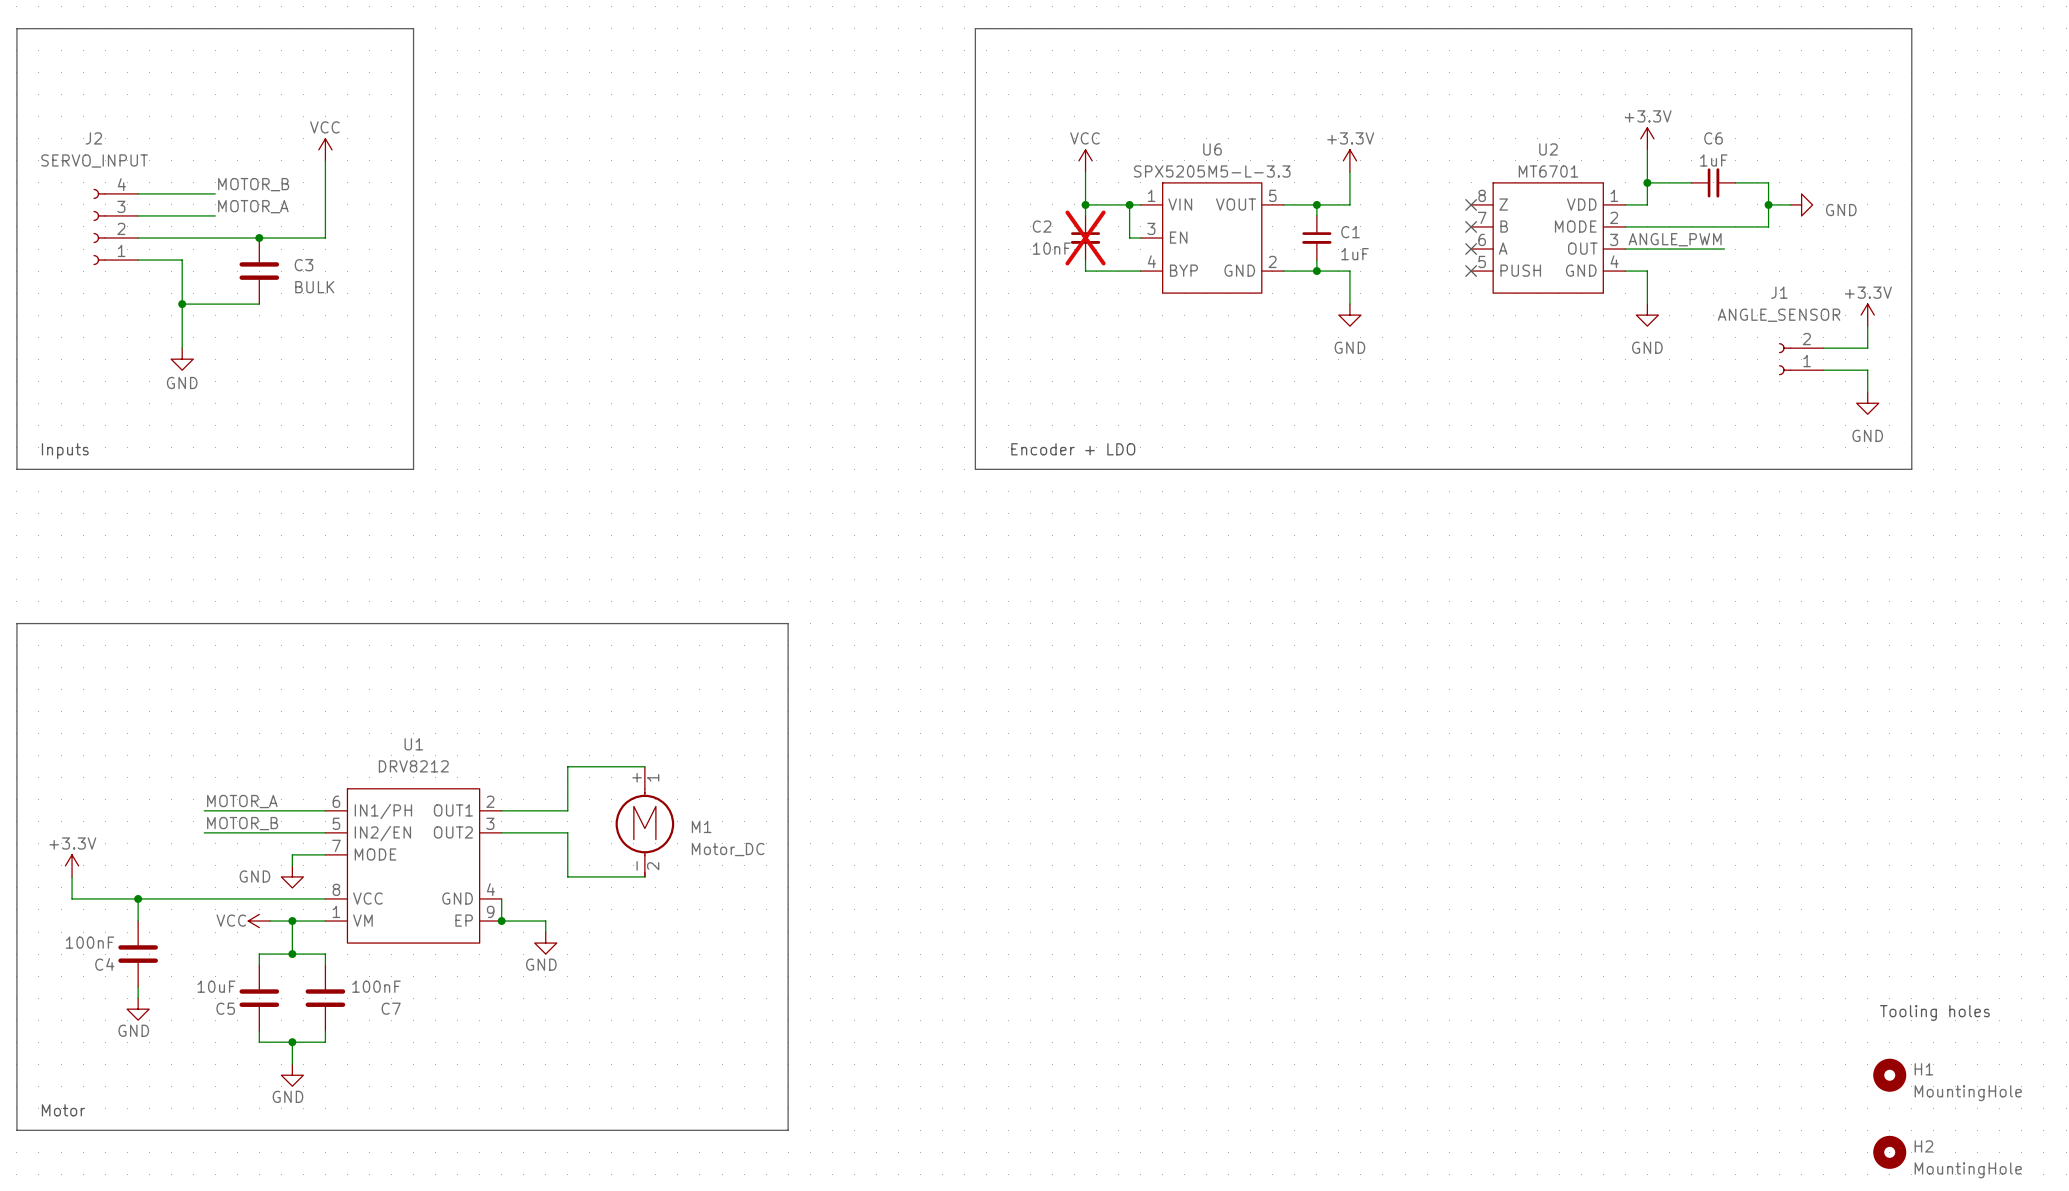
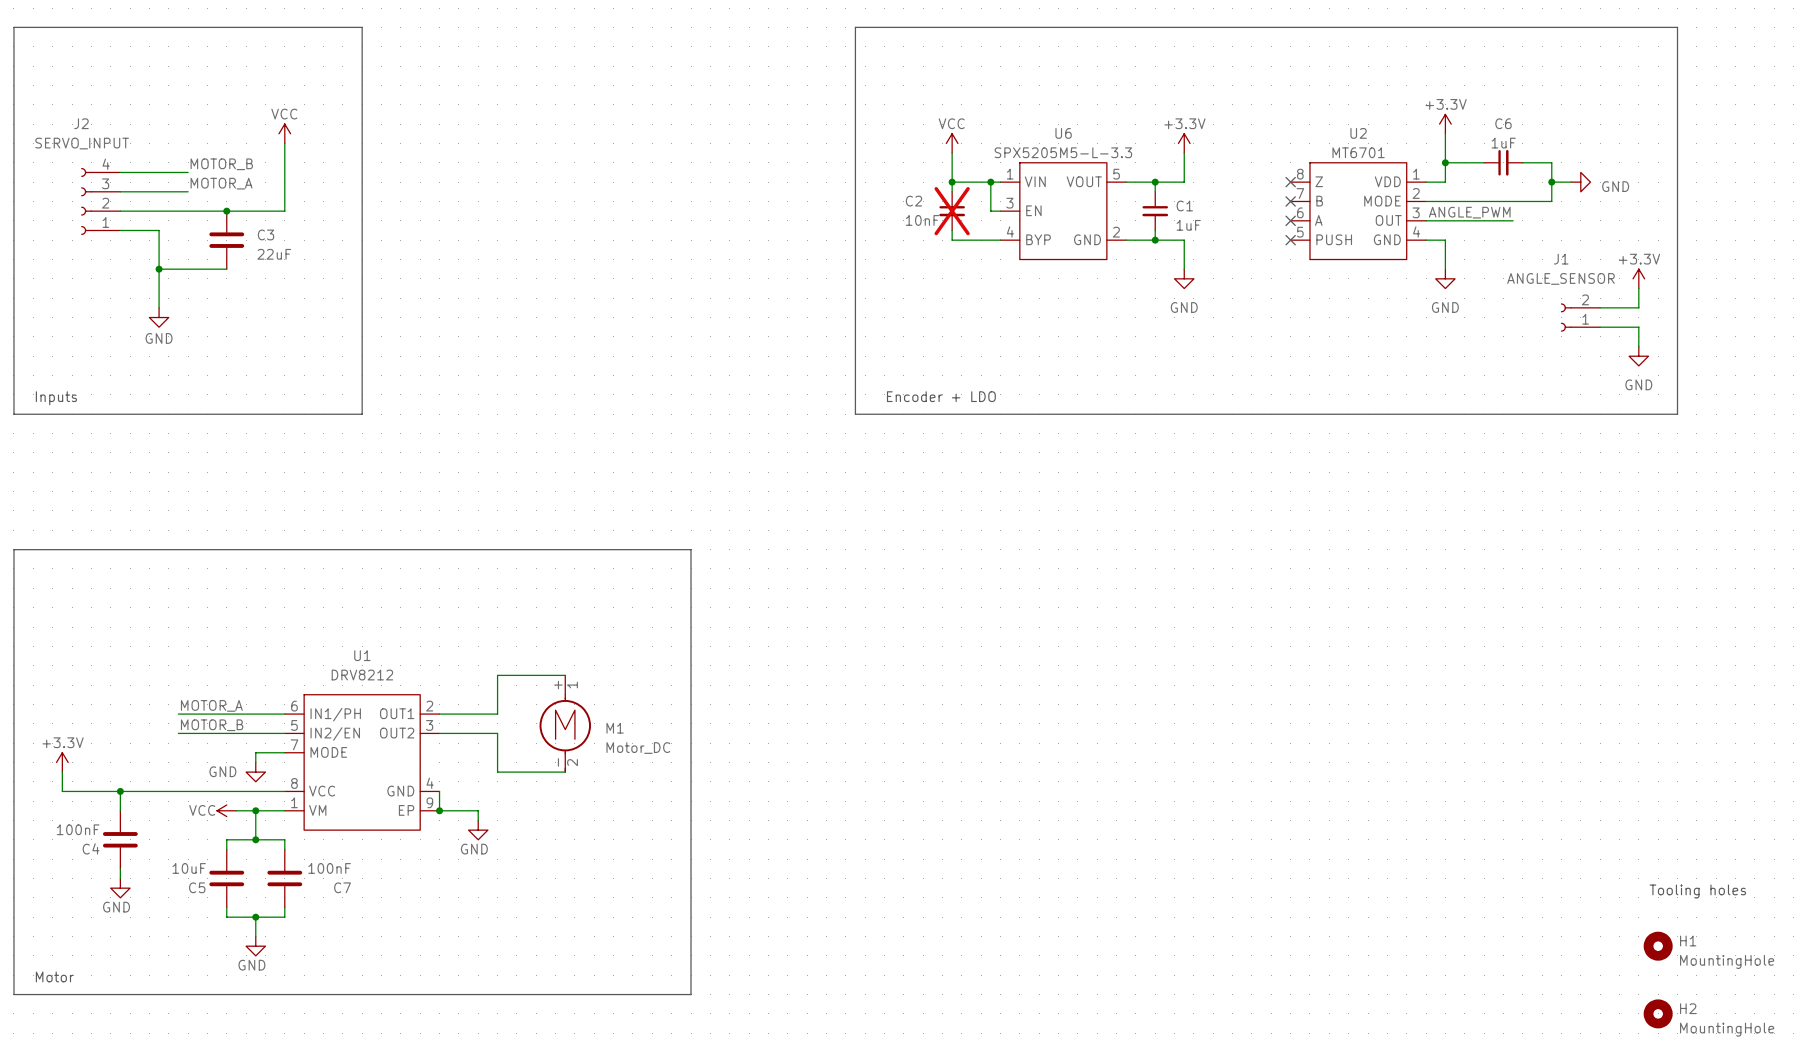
C3 value: BULK (314, 287) -> 22uF (274, 254)

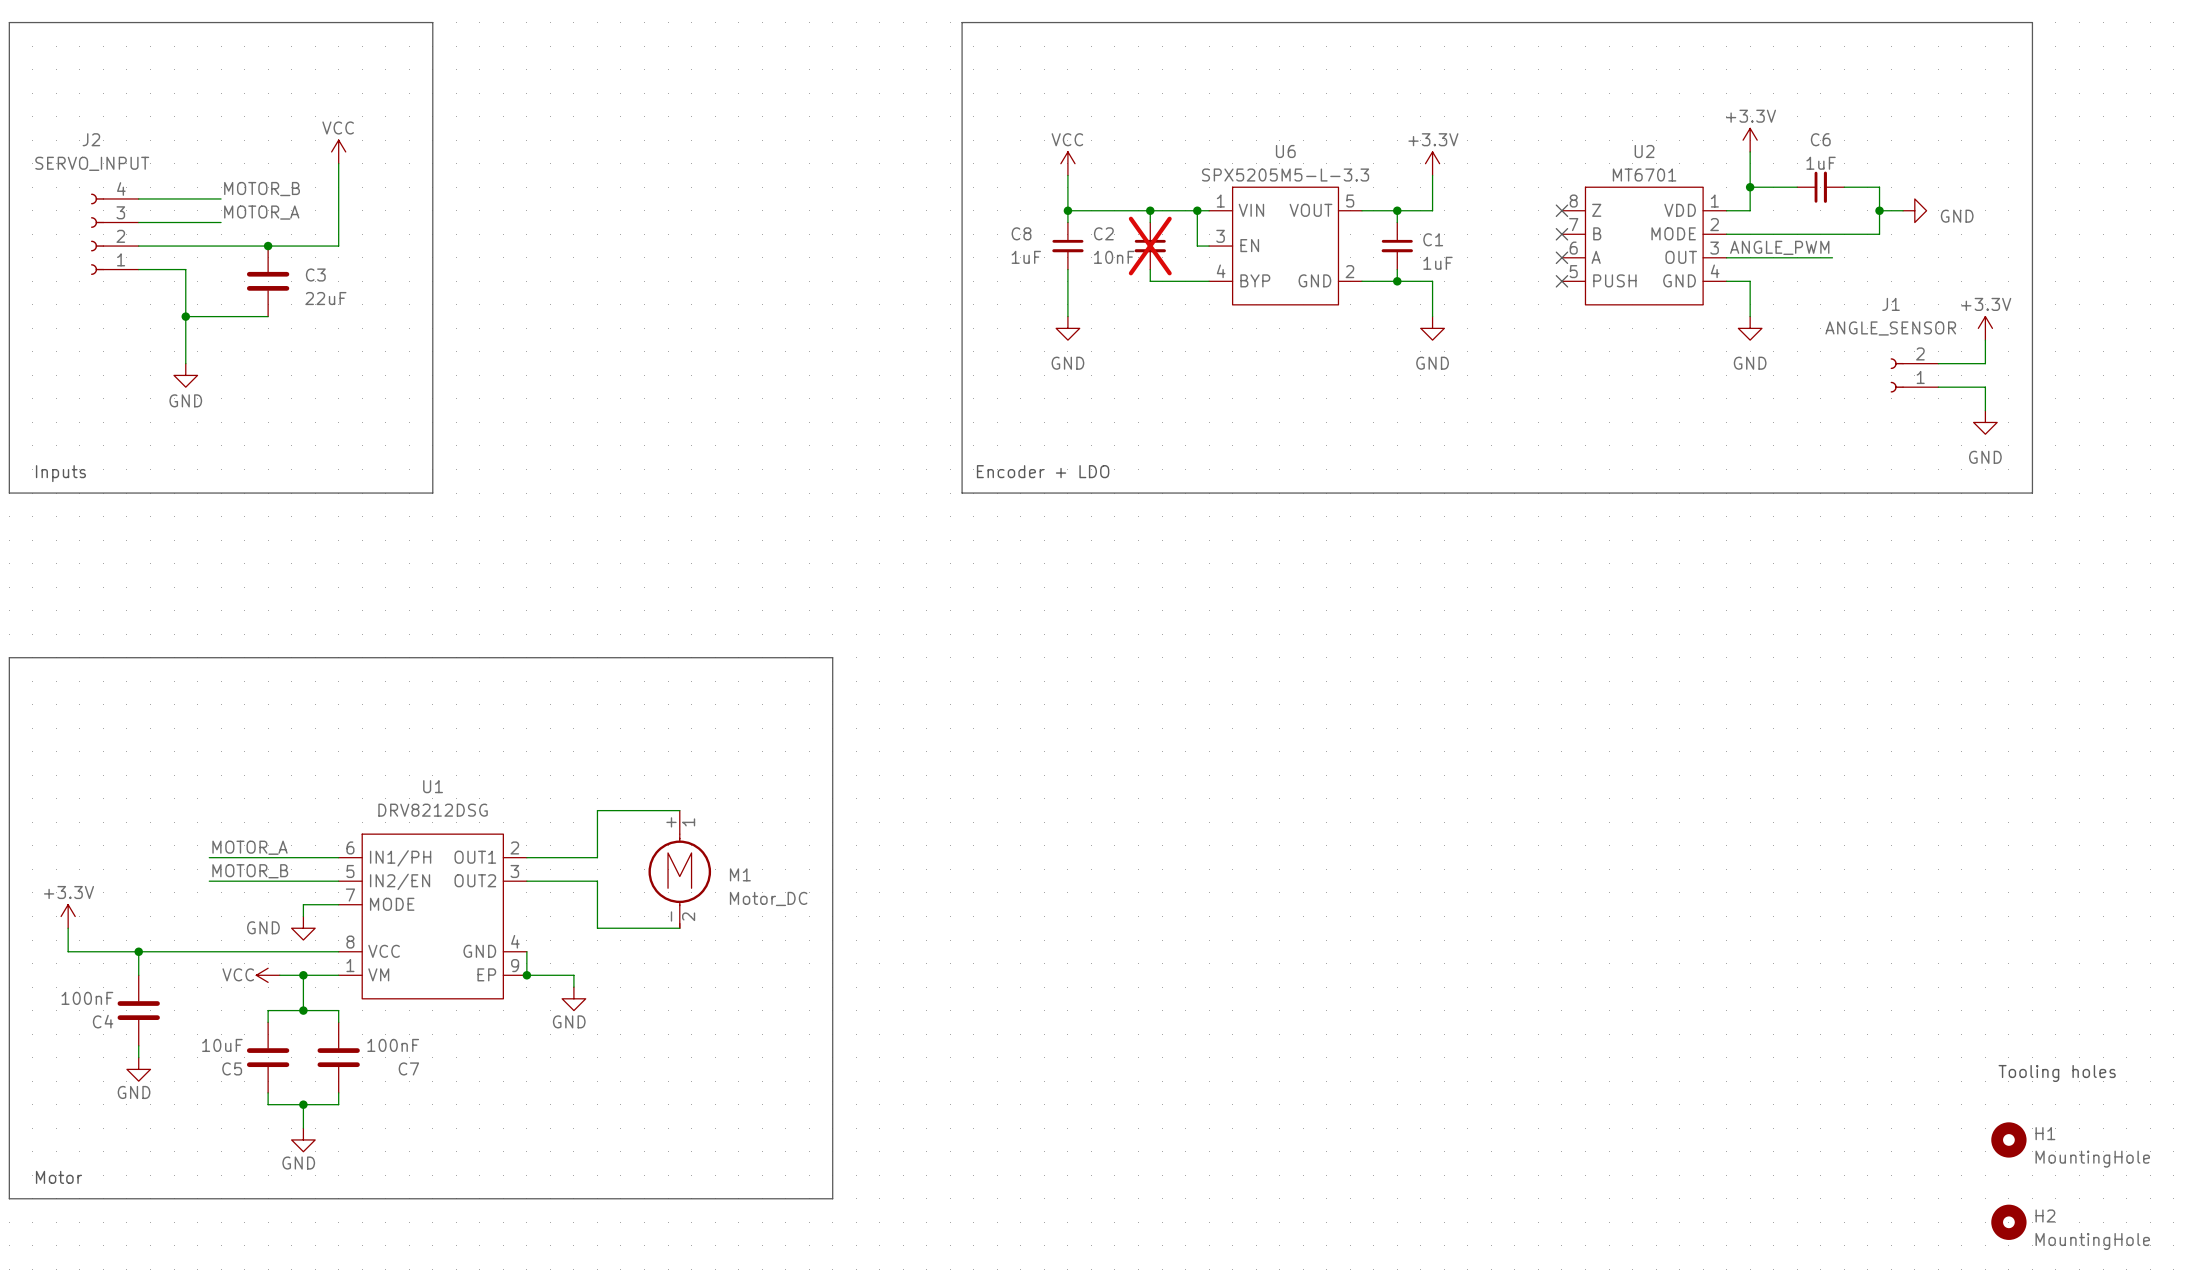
line: (855, 27) (855, 414) -> (1032, 22) (962, 22) (962, 493) (1032, 493)
power symbol position: VCC (952, 143) -> VCC (1067, 163)
wire: none -> (1067, 175) (1067, 222)
wire: (952, 153) (952, 182) -> (1067, 210) (1150, 210)
junction: none -> (1067, 210)
C8: none -> 1uF (1067, 246)
wire: none -> (1067, 269) (1067, 316)
power symbol: none -> GND (1067, 328)
text position: Encoder + LDO (941, 396) -> Encoder + LDO (1043, 471)
U1 value: DRV8212 (362, 675) -> DRV8212DSG (433, 810)

